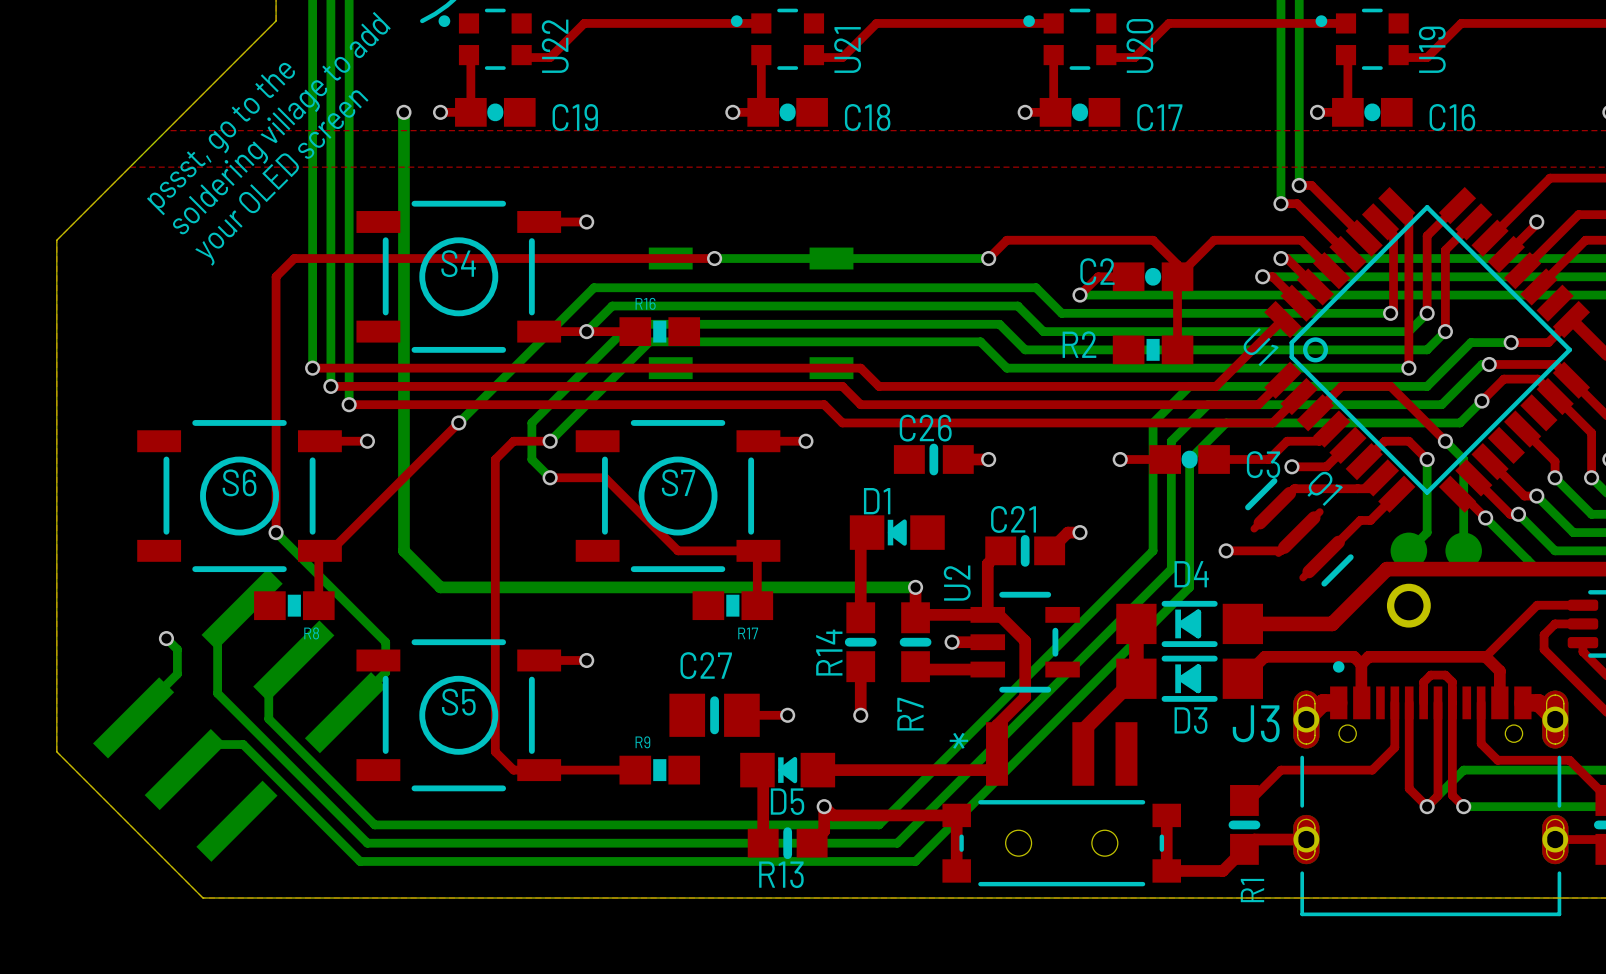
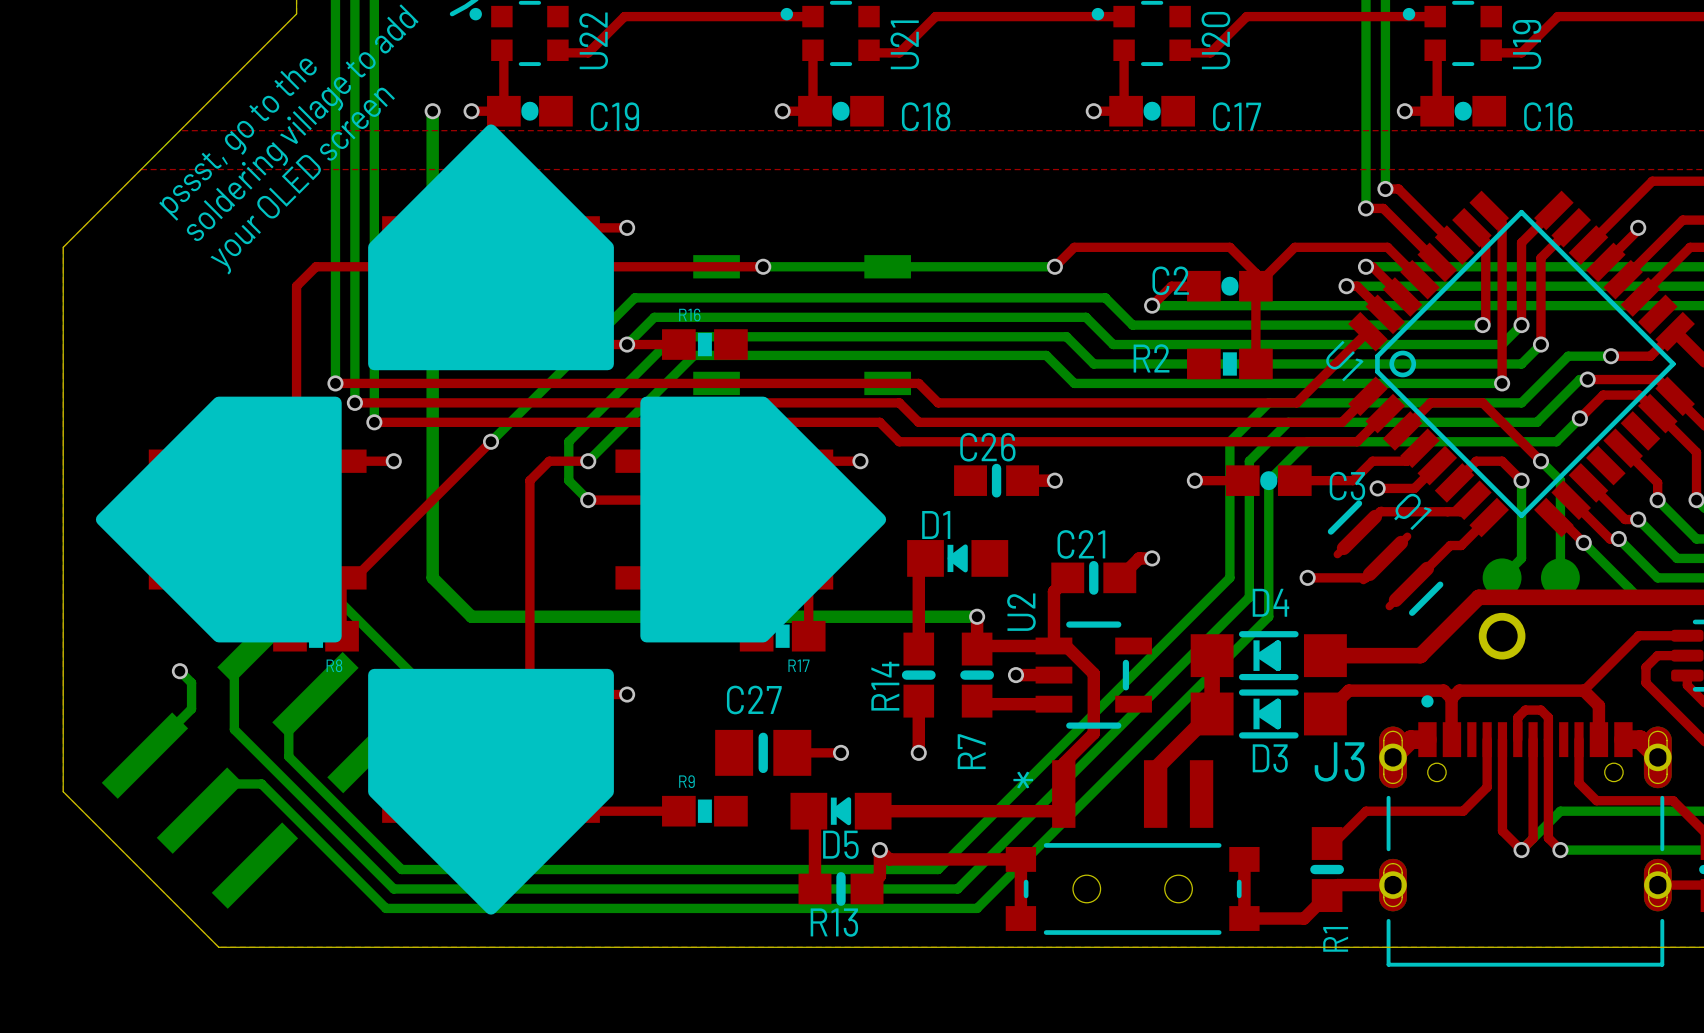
drawing: none -> [368, 124, 614, 371]
drawing: none -> [95, 396, 342, 643]
drawing: none -> [640, 396, 887, 643]
drawing: none -> [368, 668, 614, 915]

